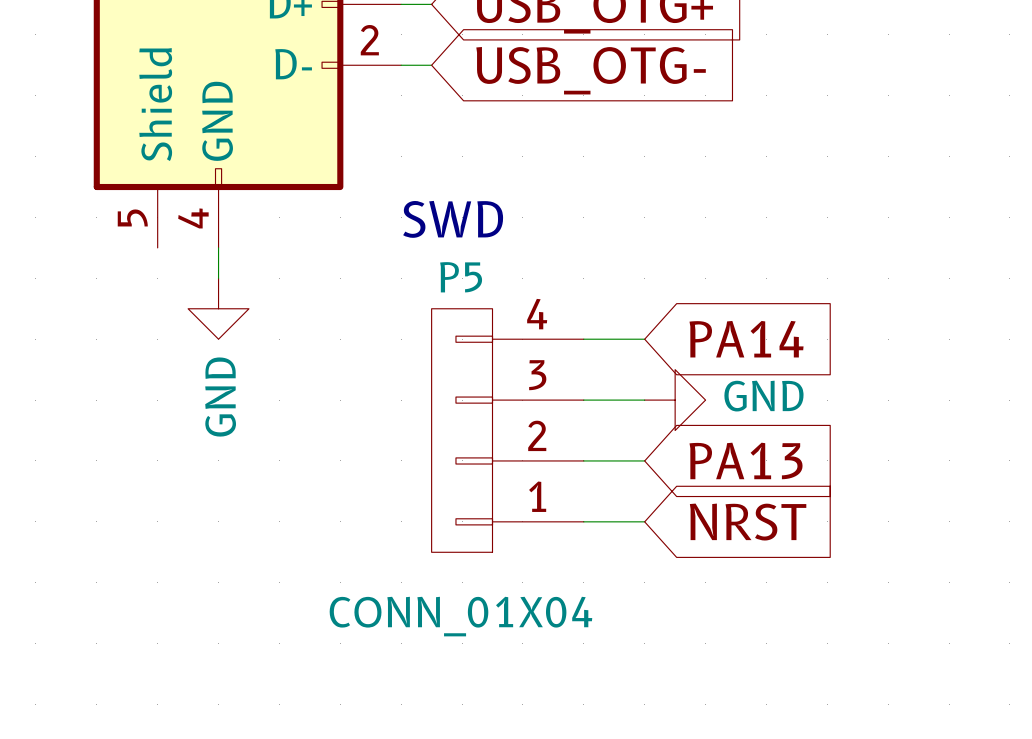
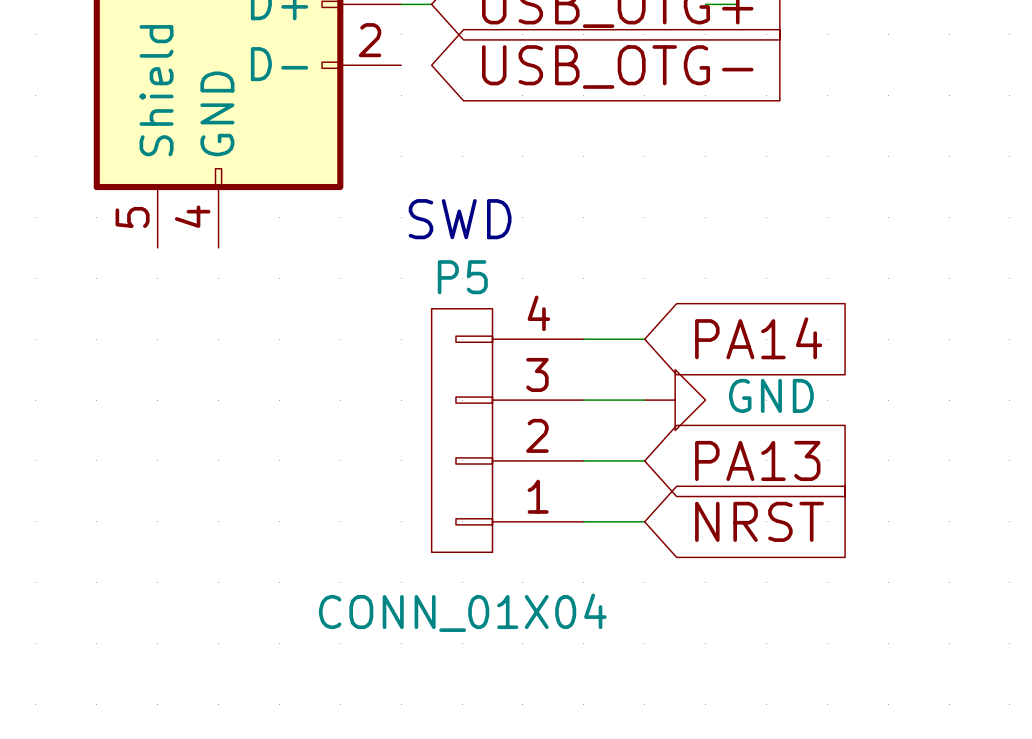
wire: (401, 65) (431, 65) -> (705, 4) (736, 4)
wire: (218, 247) (218, 278) -> none
power symbol: GND (218, 308) -> none

